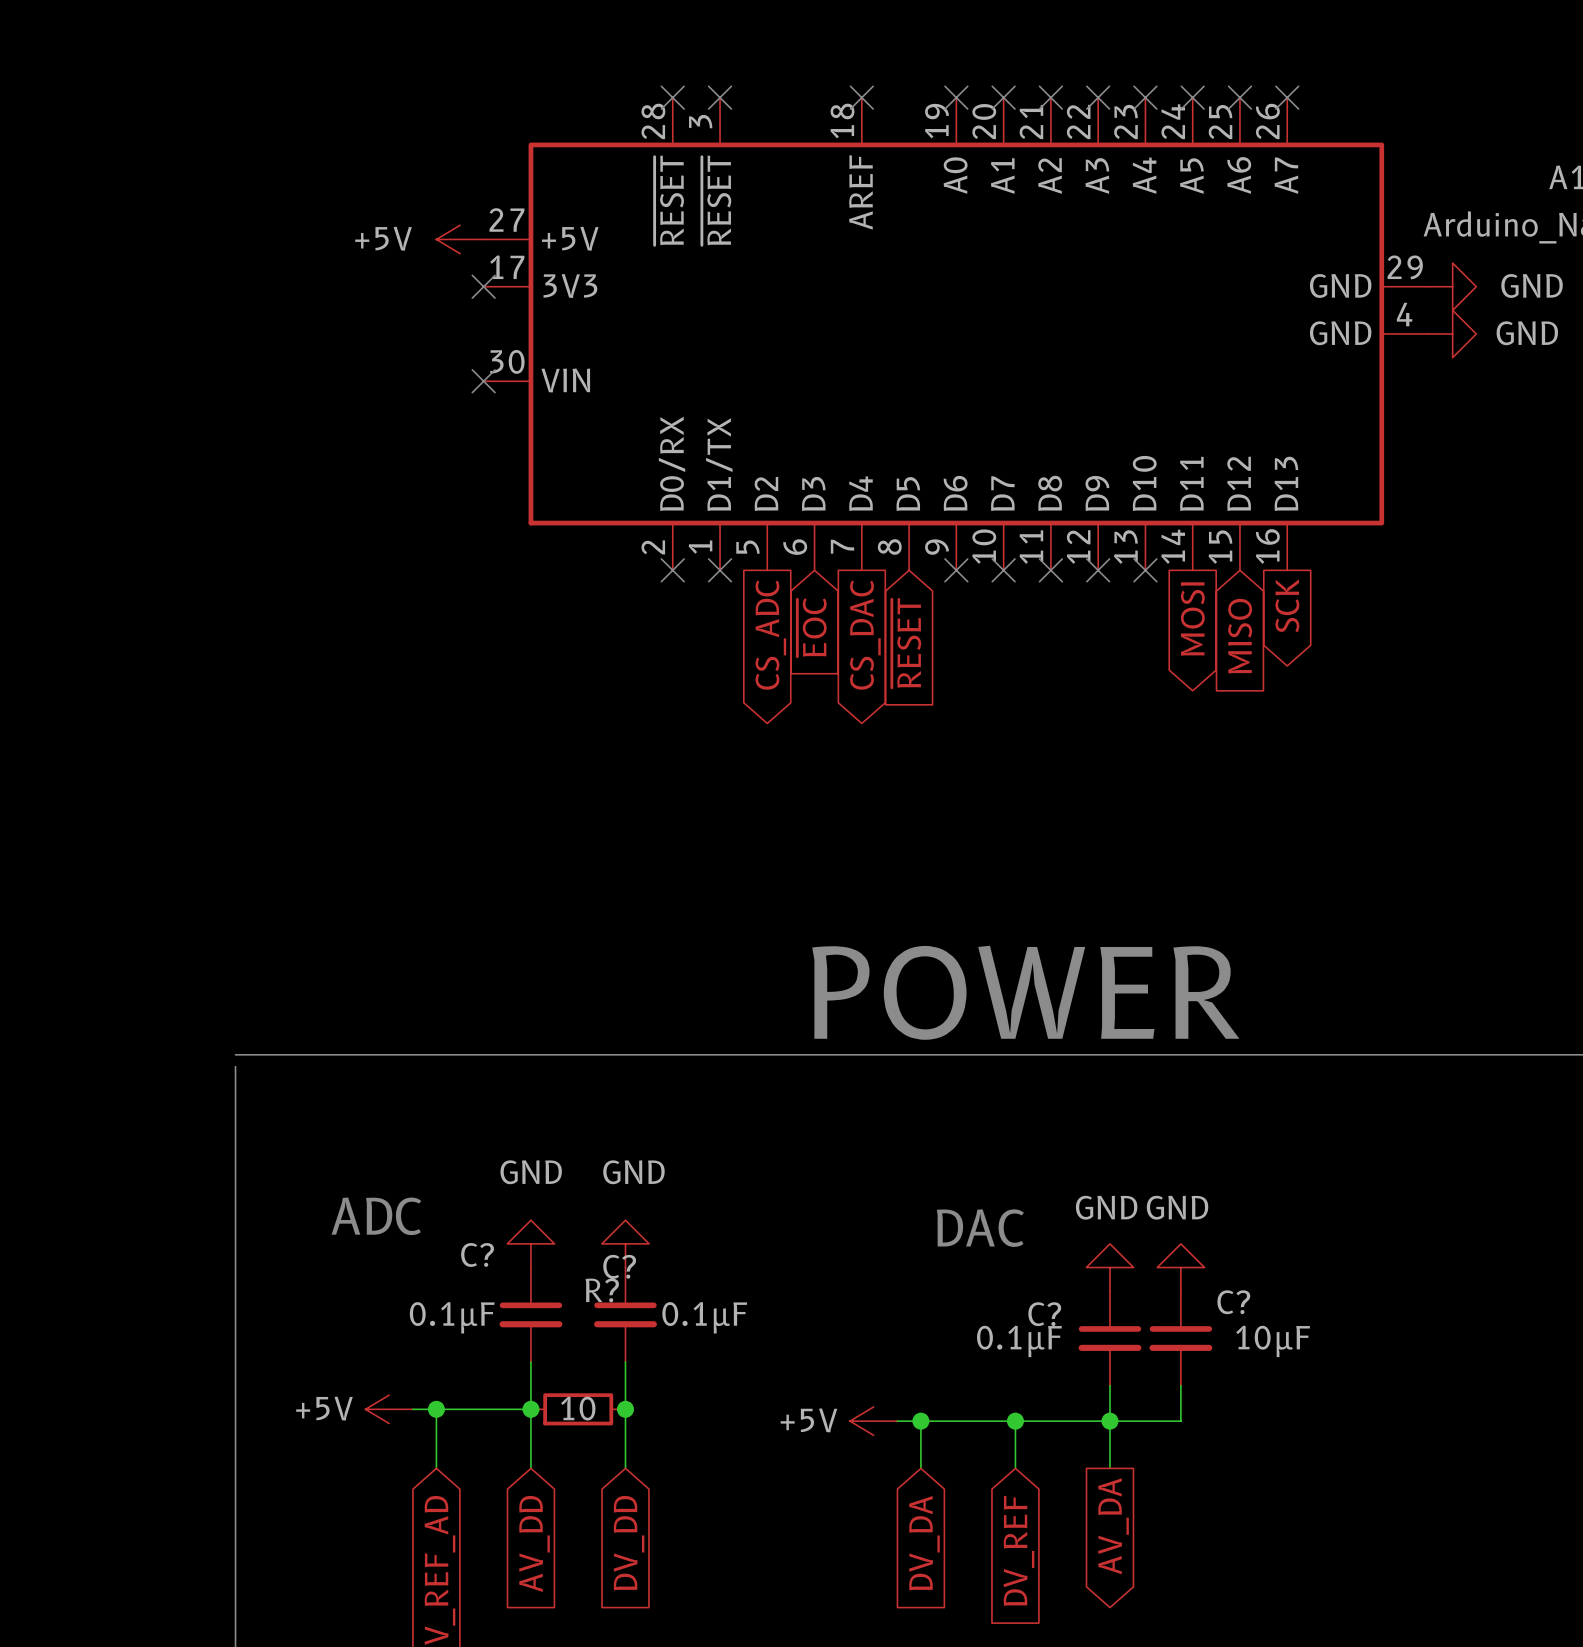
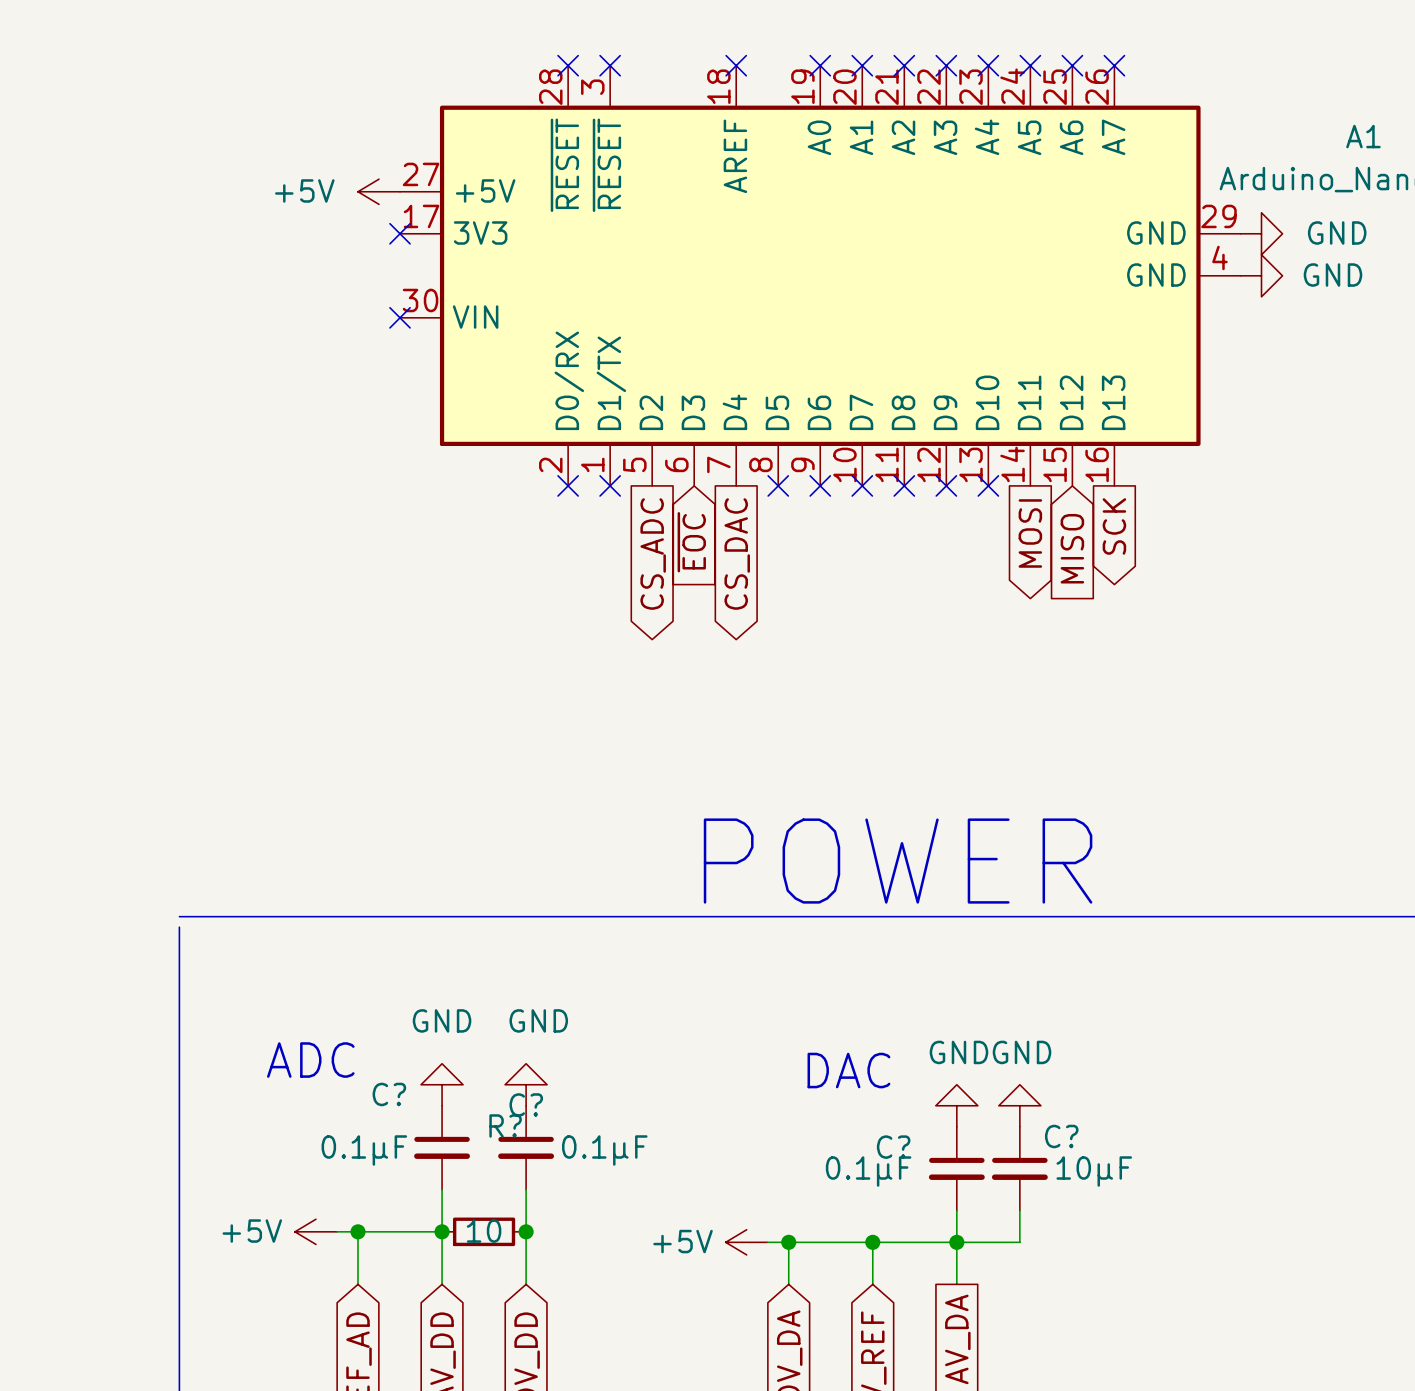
no-connect mark: none -> (778, 485)
global label: ~{RESET} (906, 643) -> none

